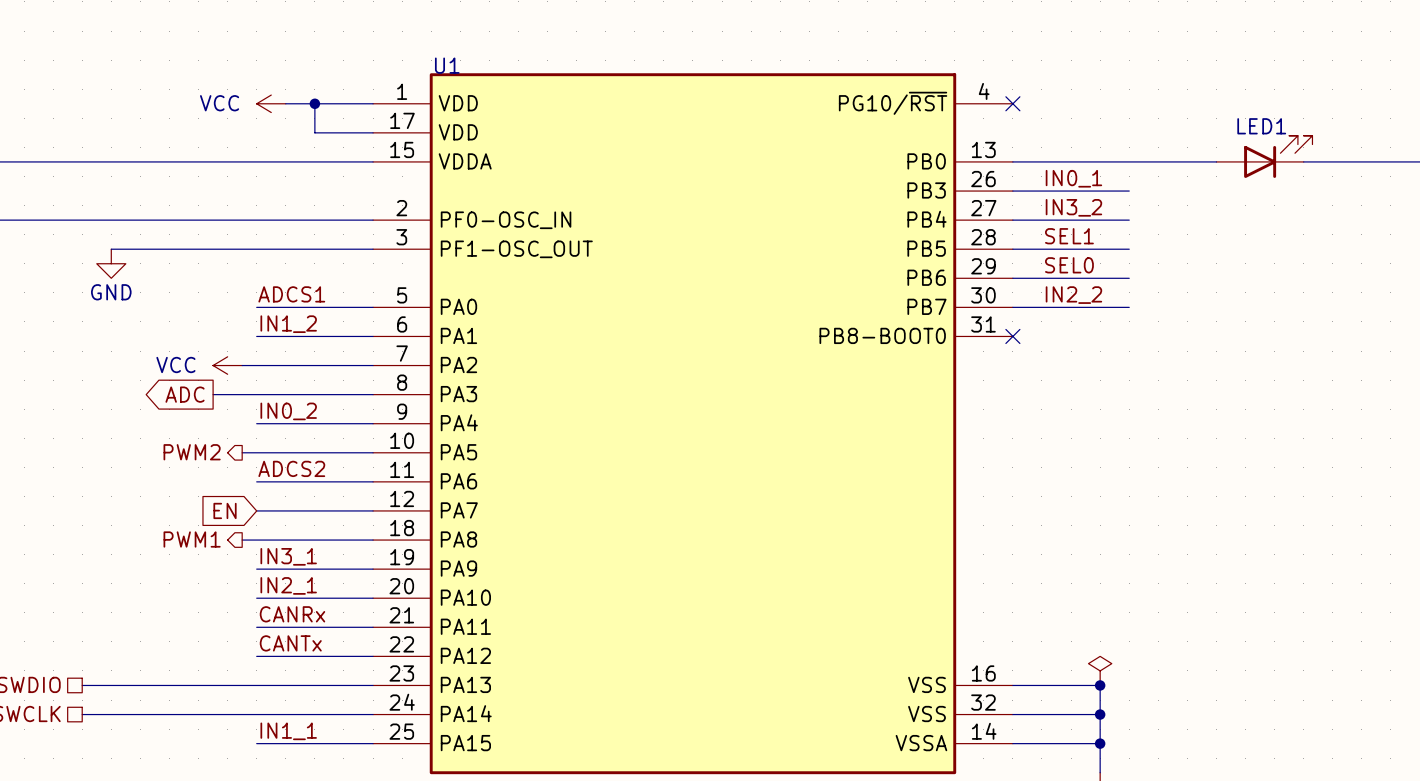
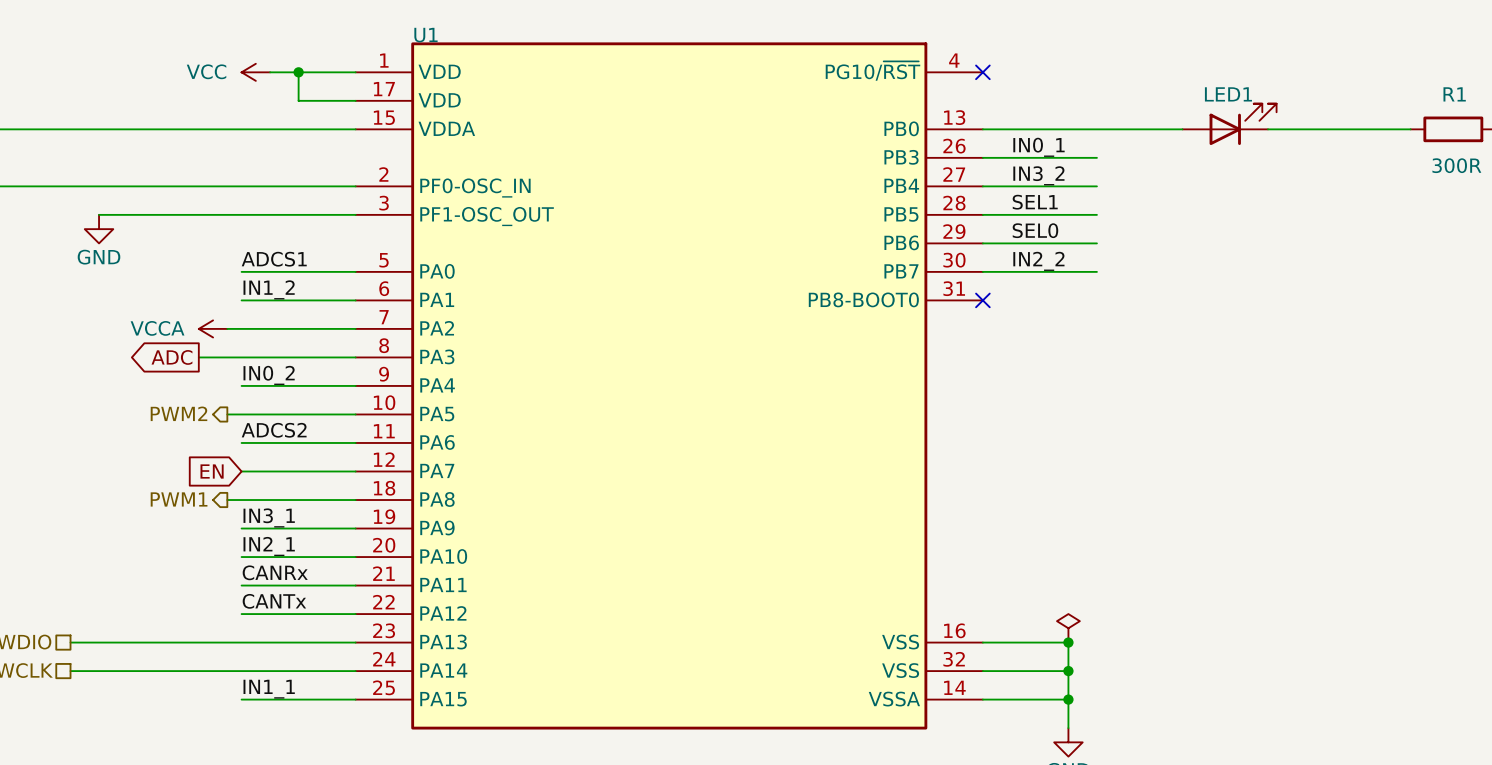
power symbol: VCC (227, 365) -> VCCA (213, 328)

